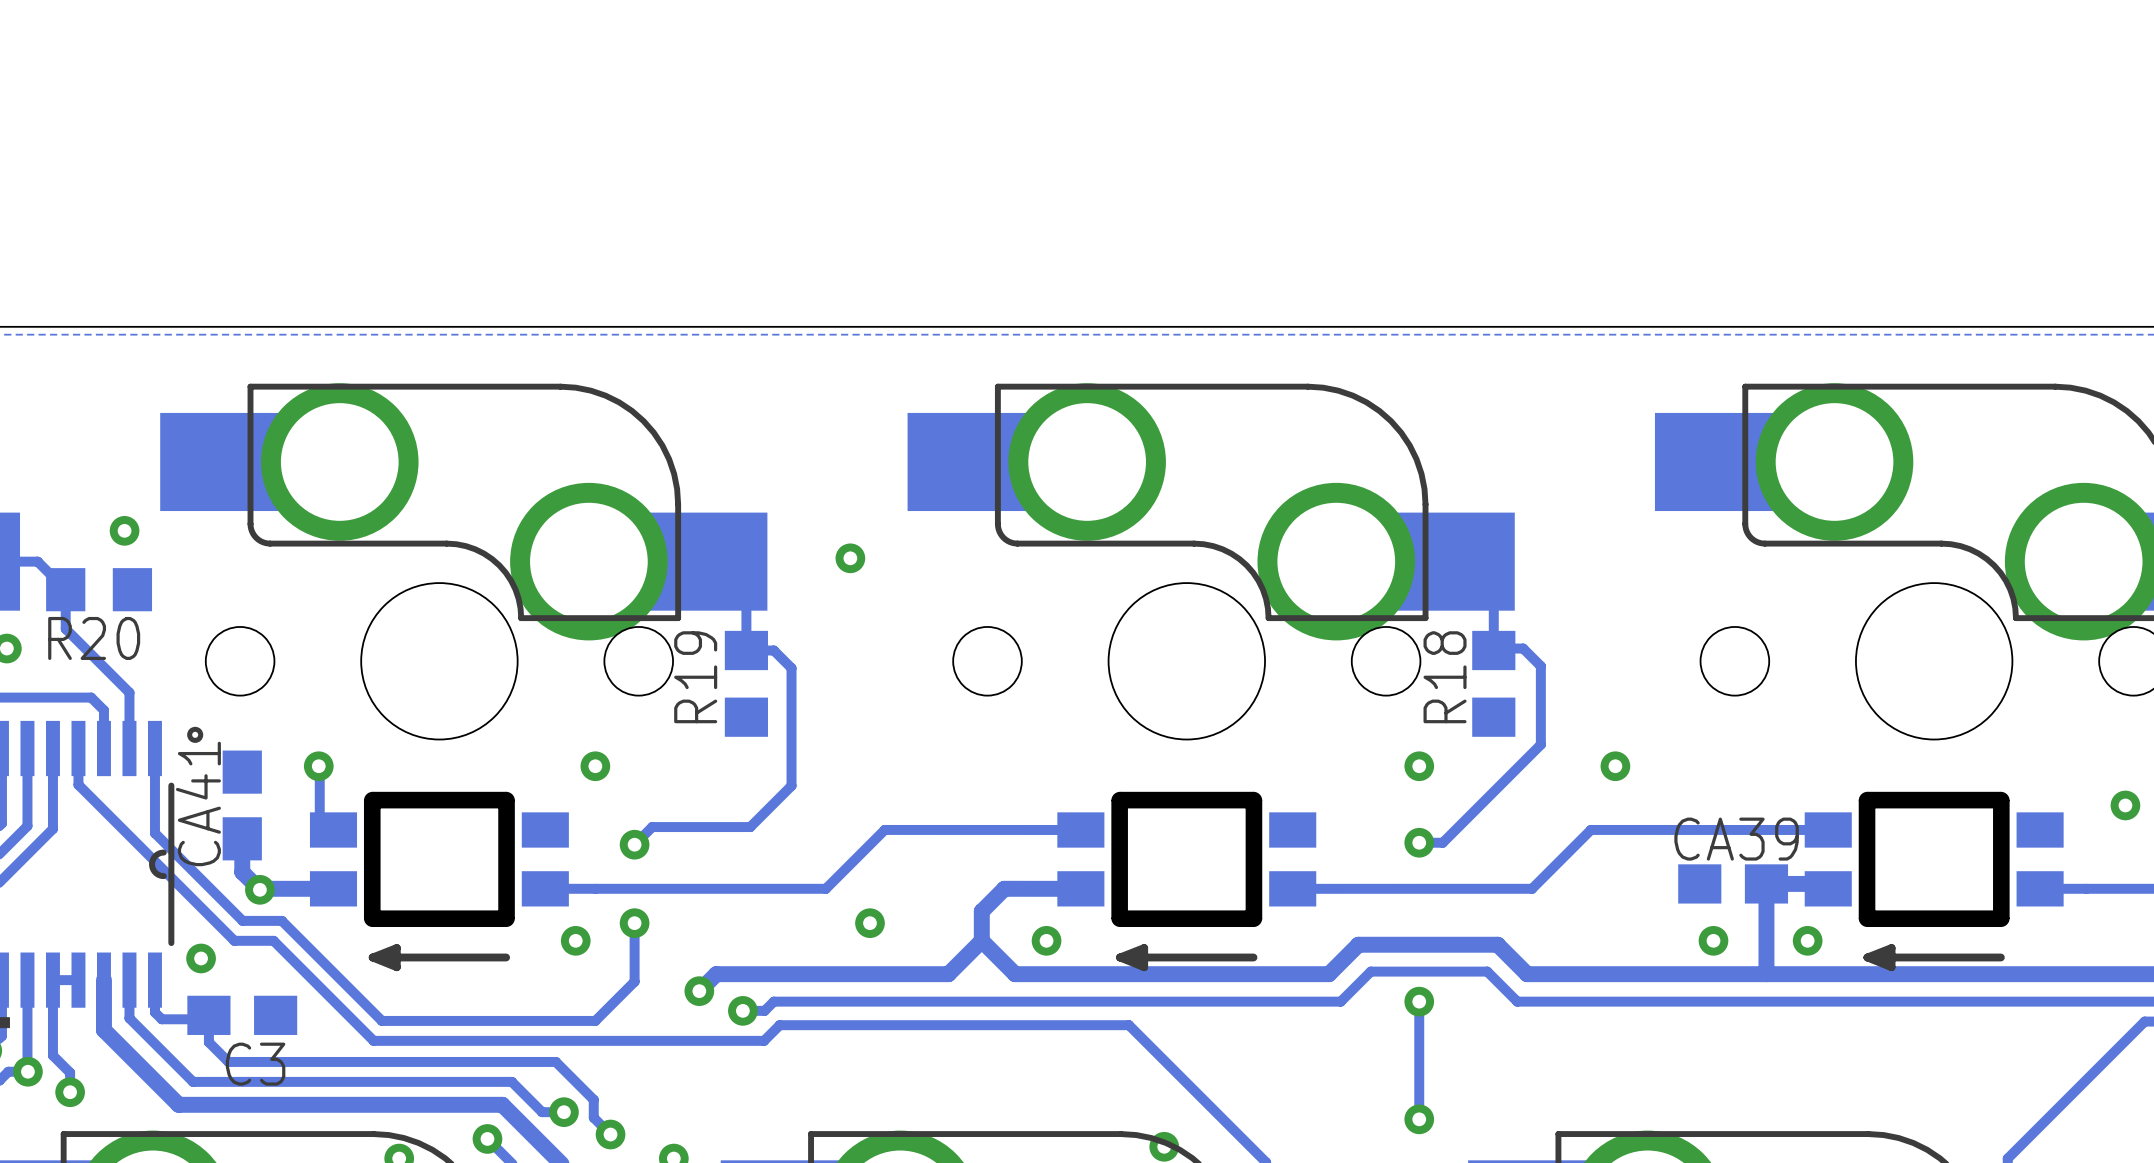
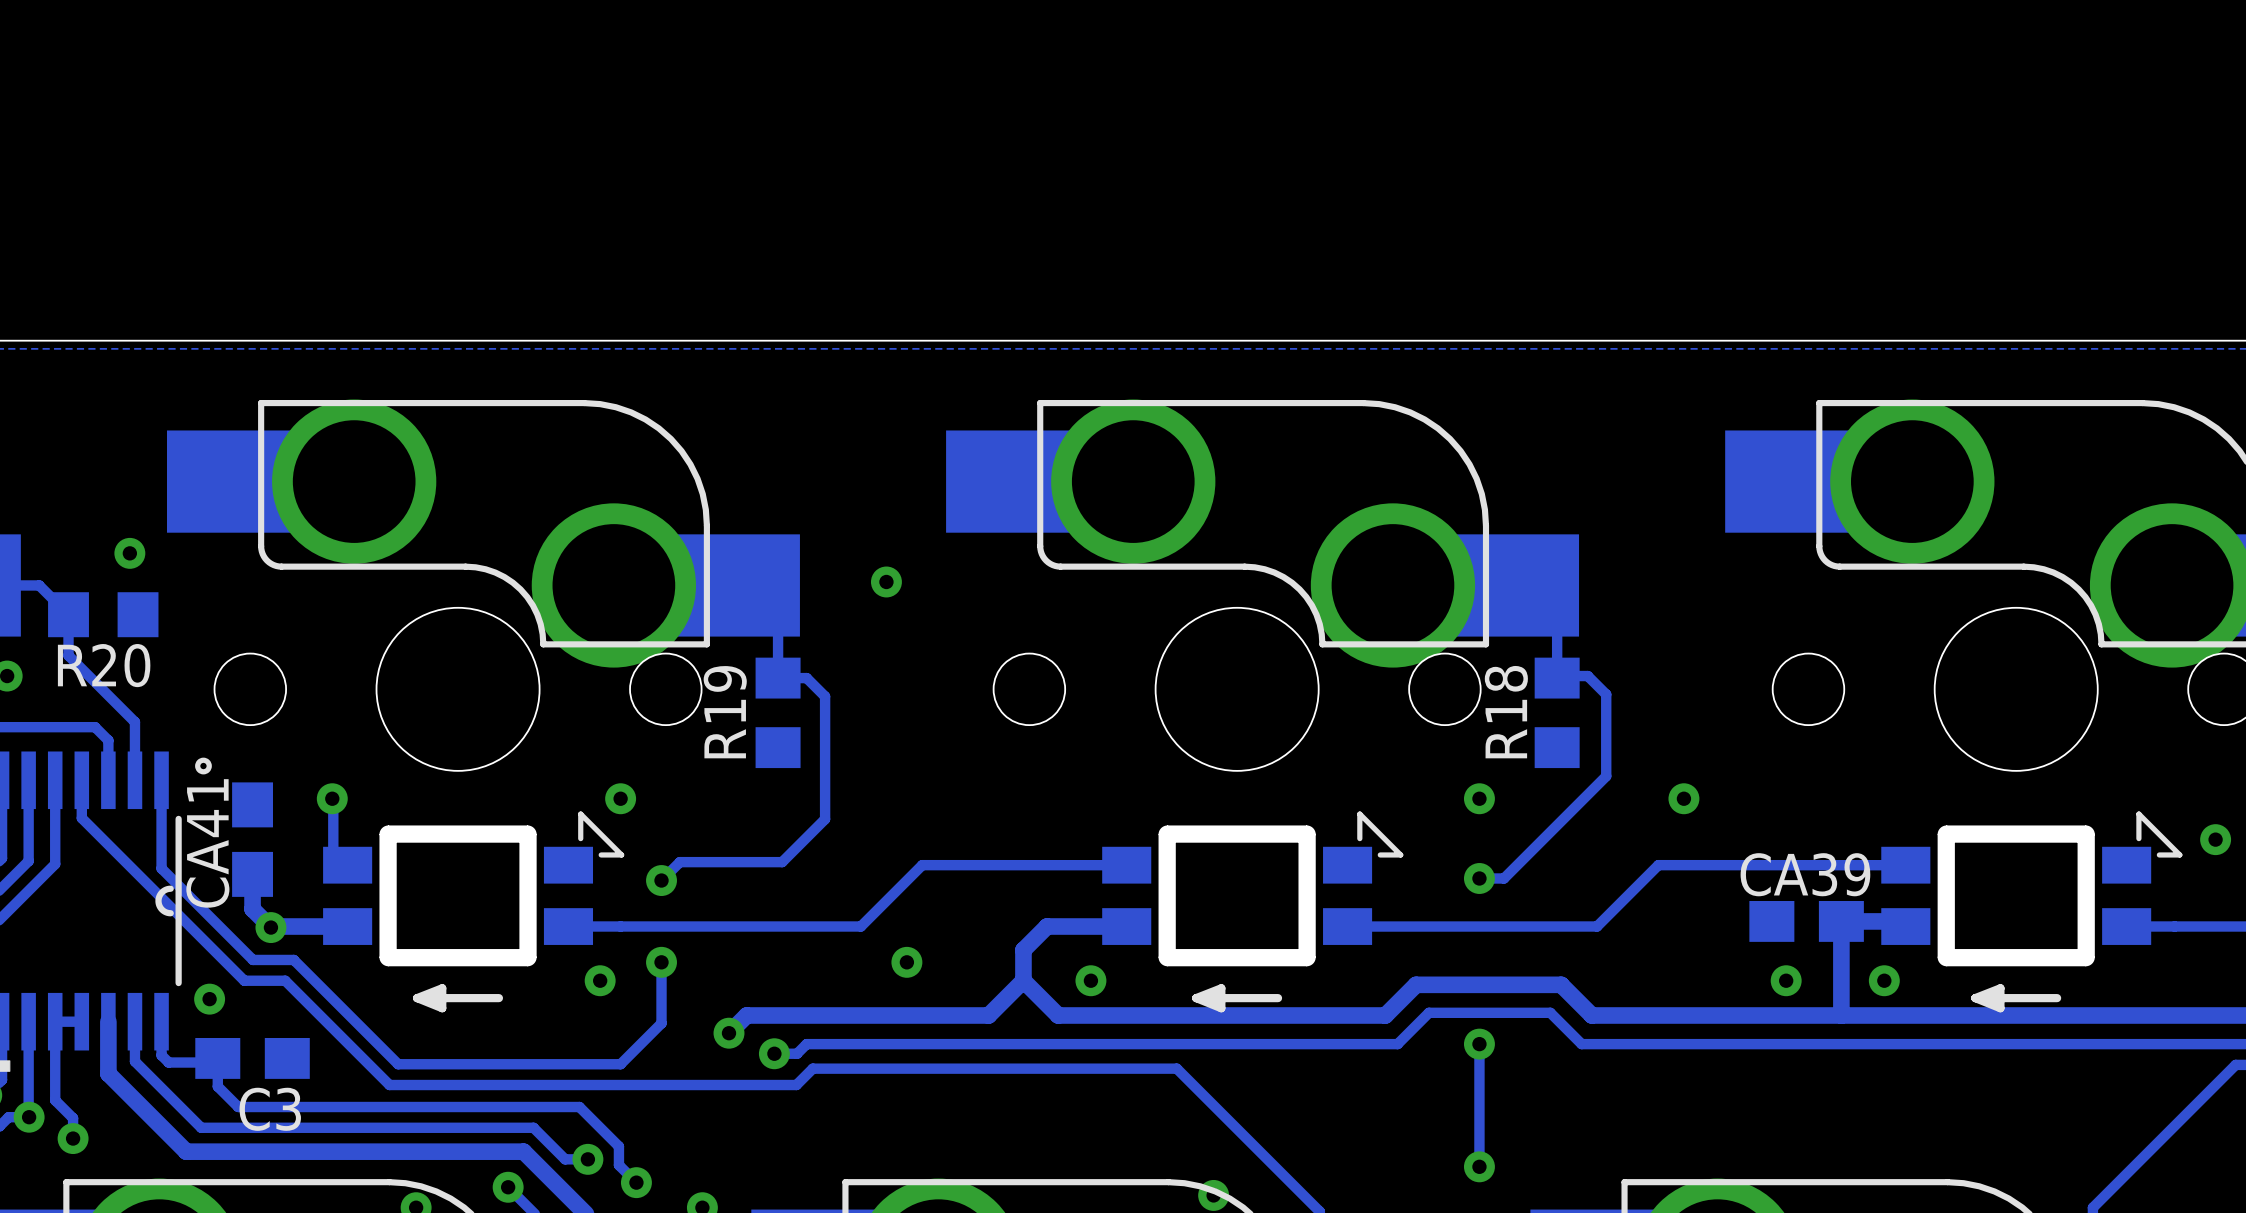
part footprint: [309, 792, 569, 972] -> [323, 811, 625, 1013]
part footprint: [1057, 792, 1317, 972] -> [1102, 811, 1404, 1013]
part footprint: [1804, 792, 2064, 972] -> [1881, 811, 2183, 1013]

